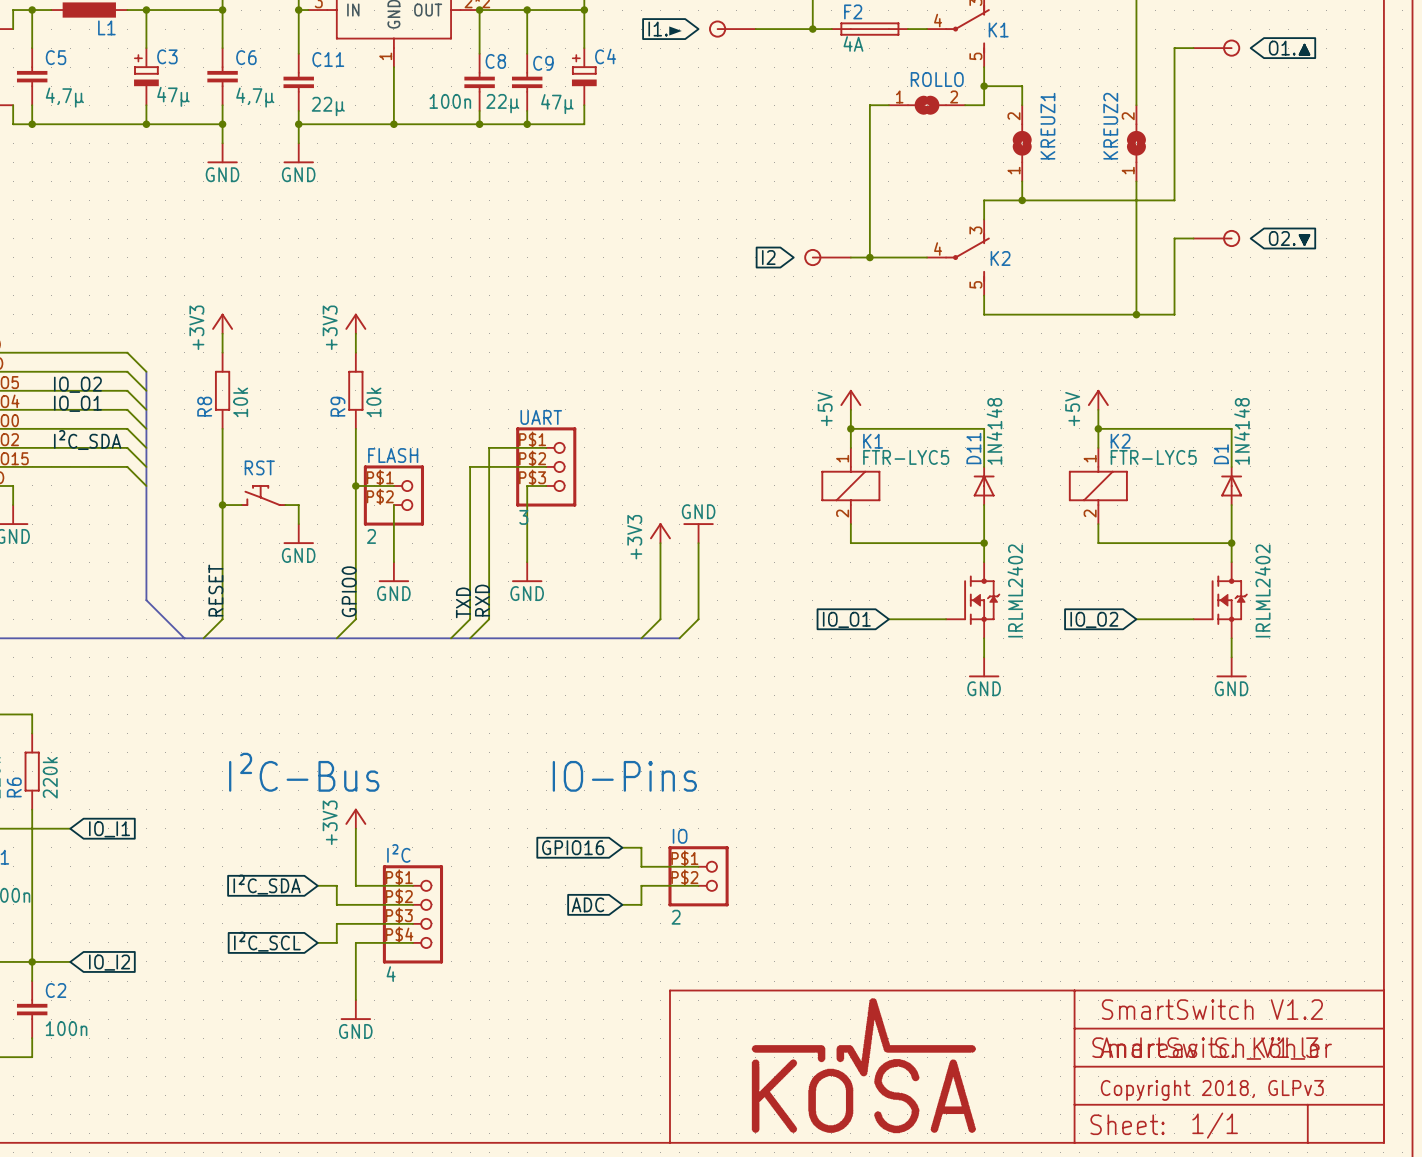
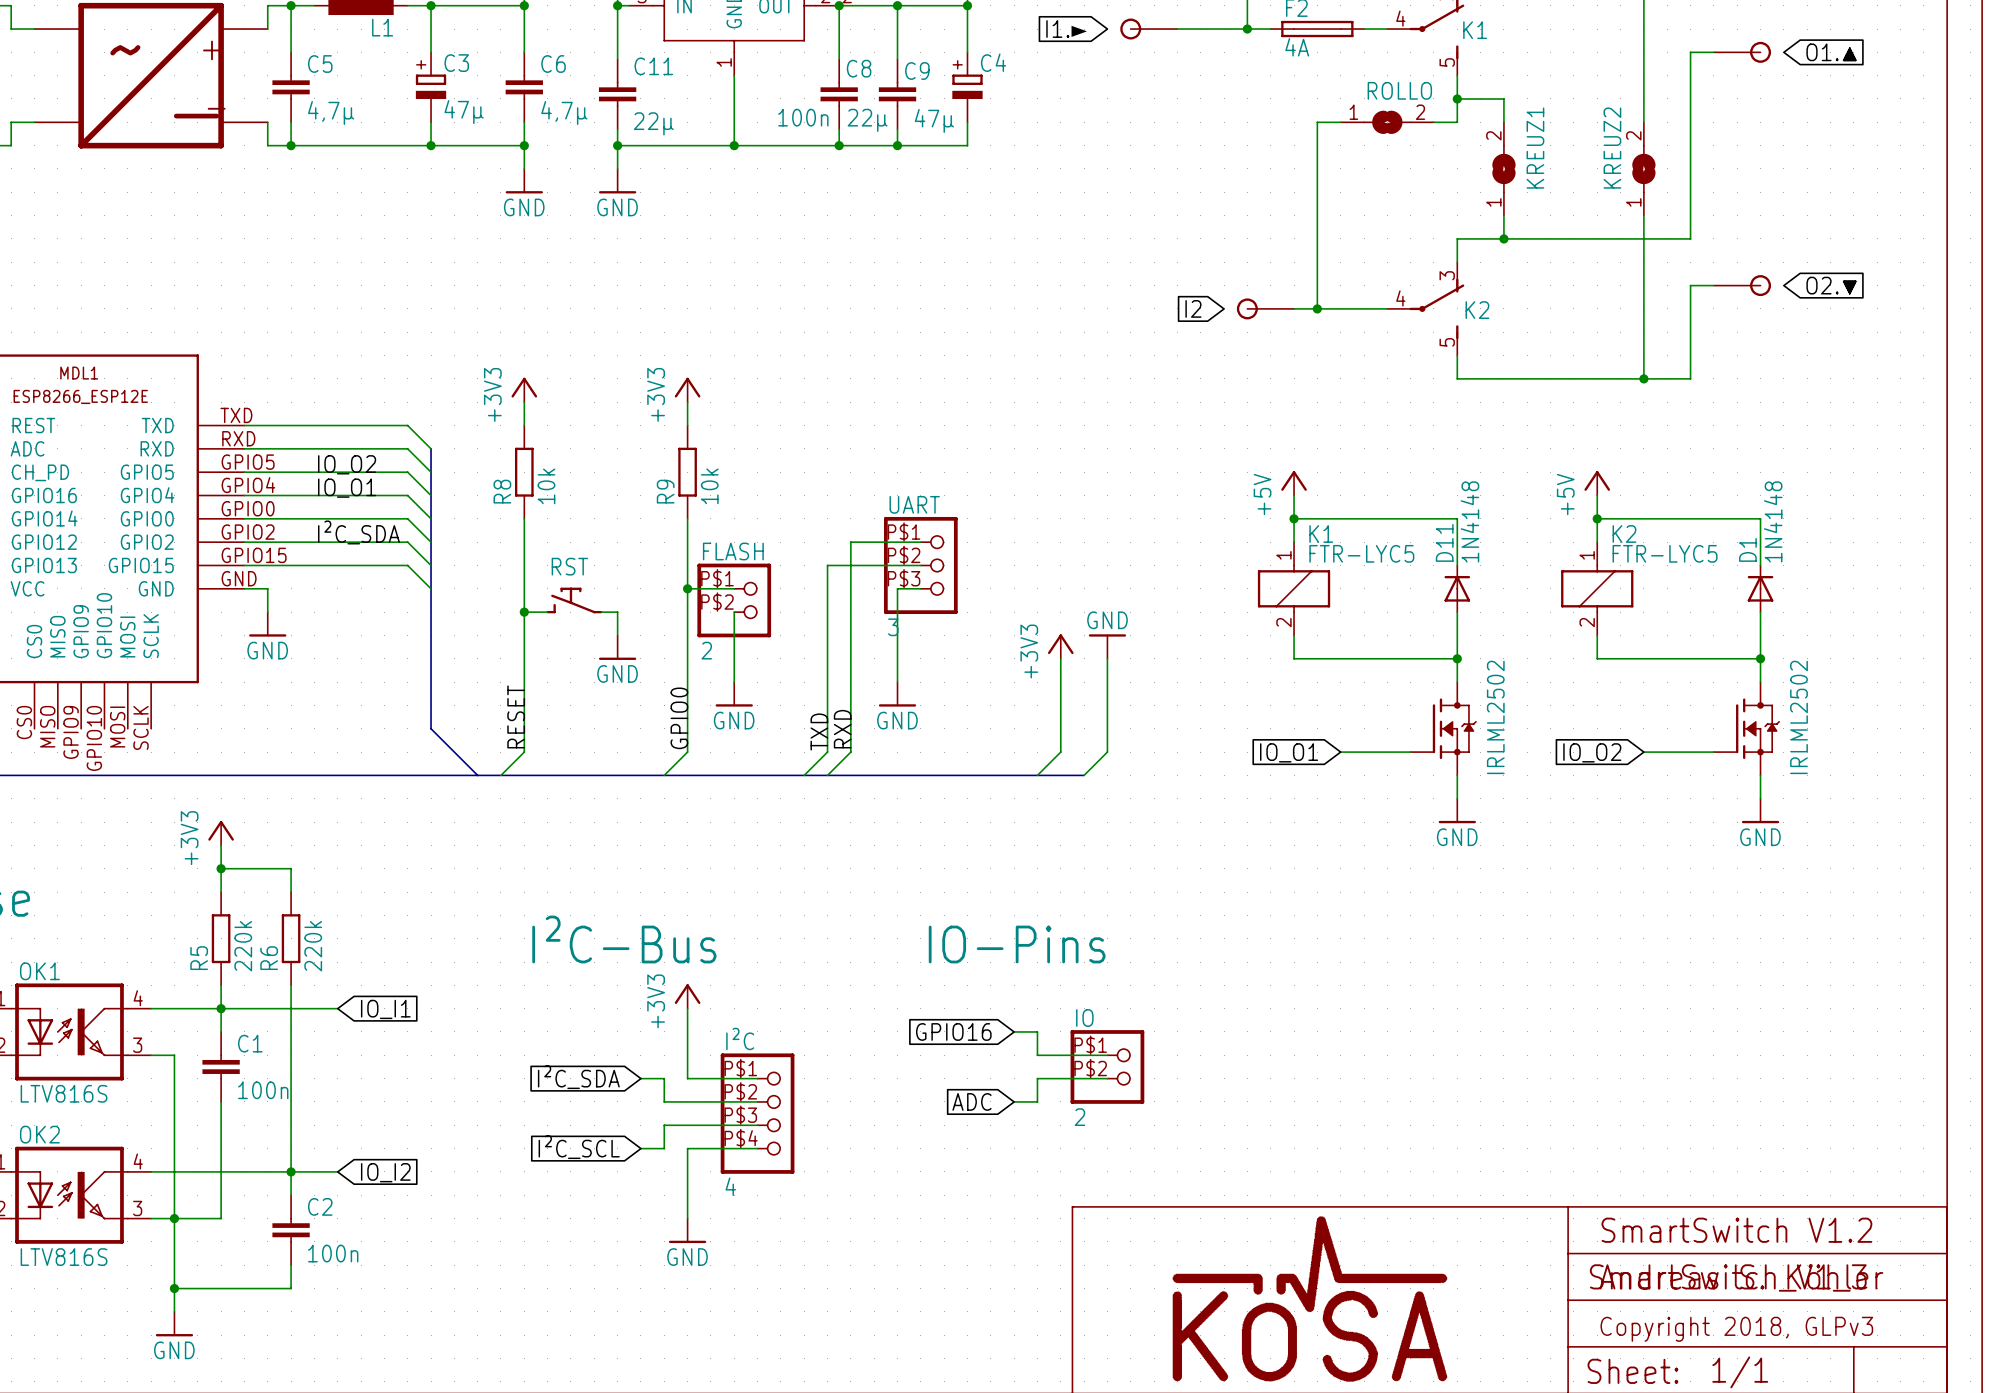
part value: IRLML2402 (1015, 590) -> IRLML2502 (1495, 717)
part value: IRLML2402 (1262, 590) -> IRLML2502 (1799, 717)

